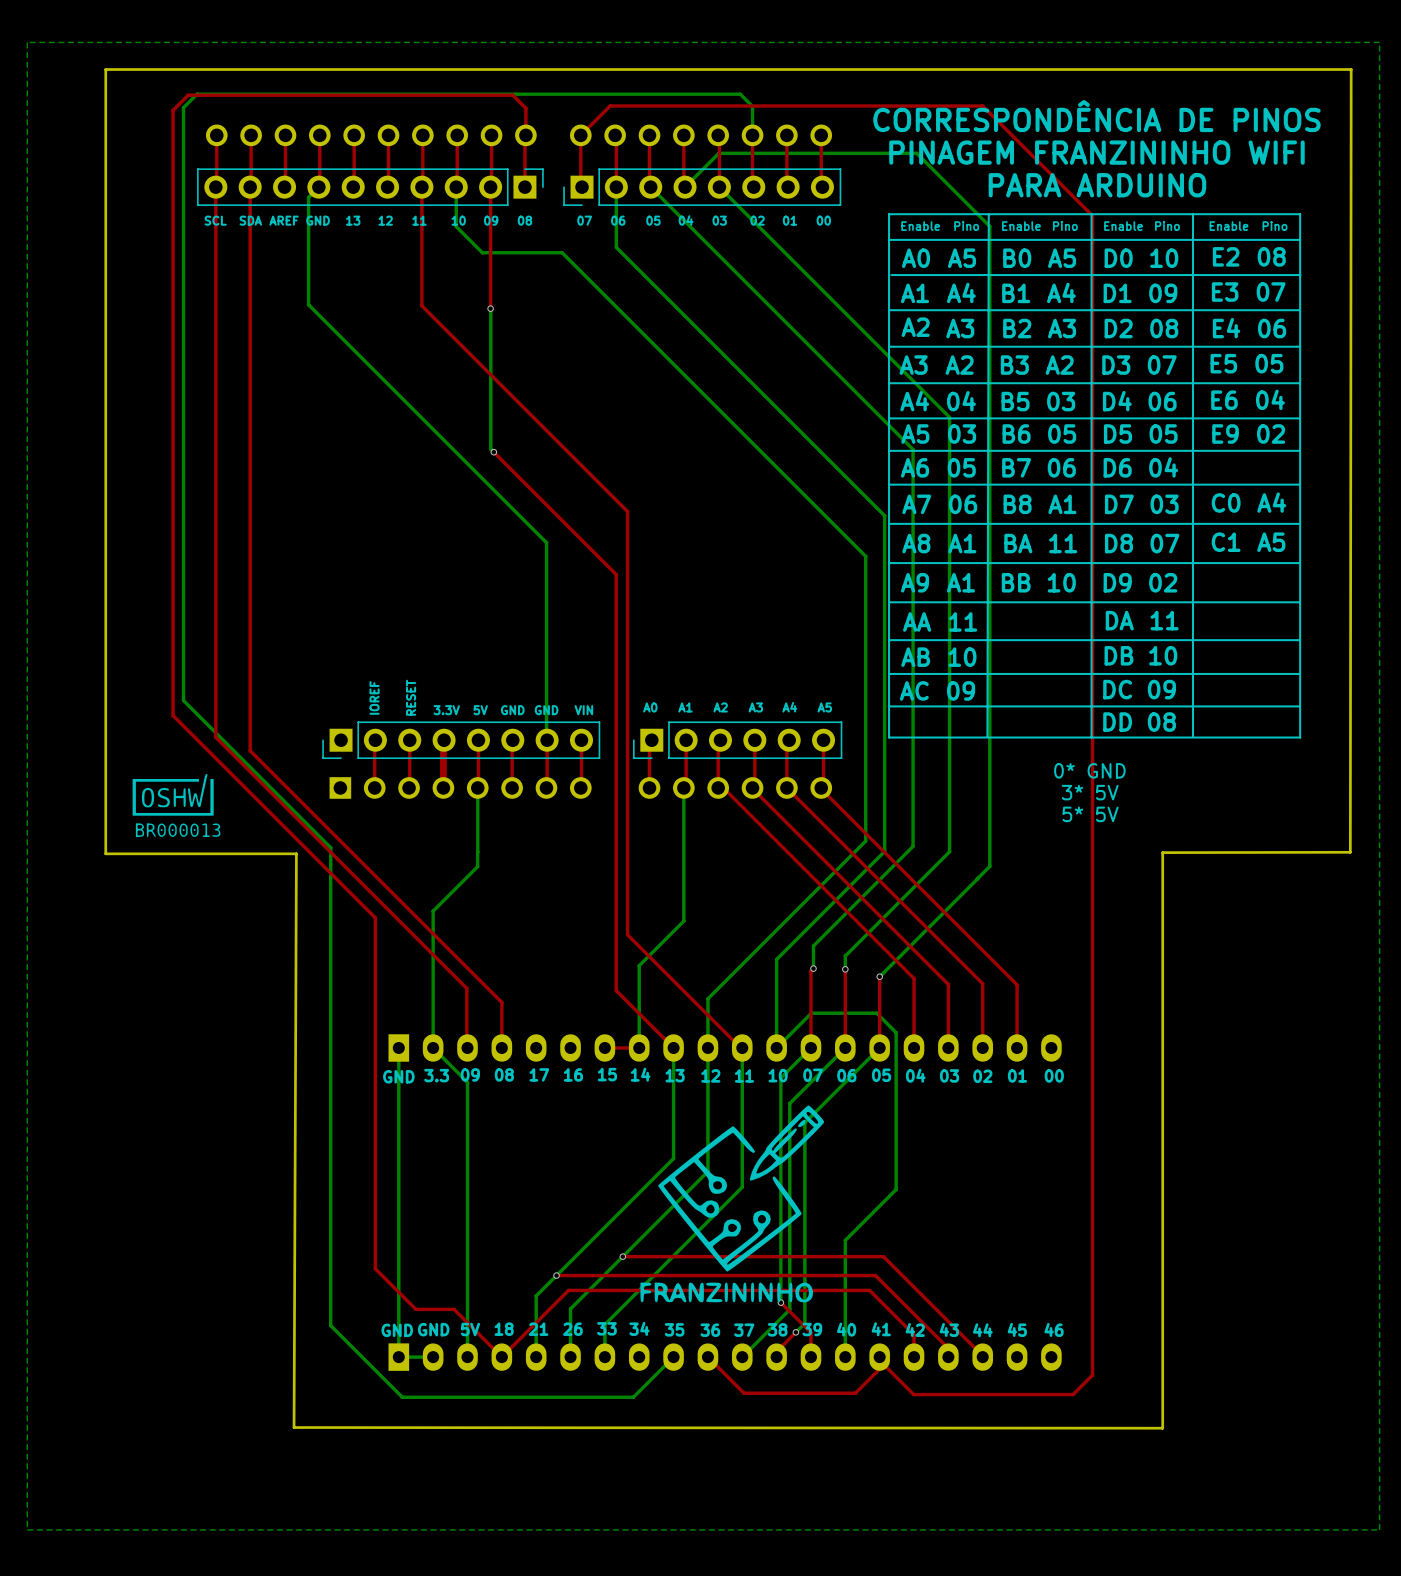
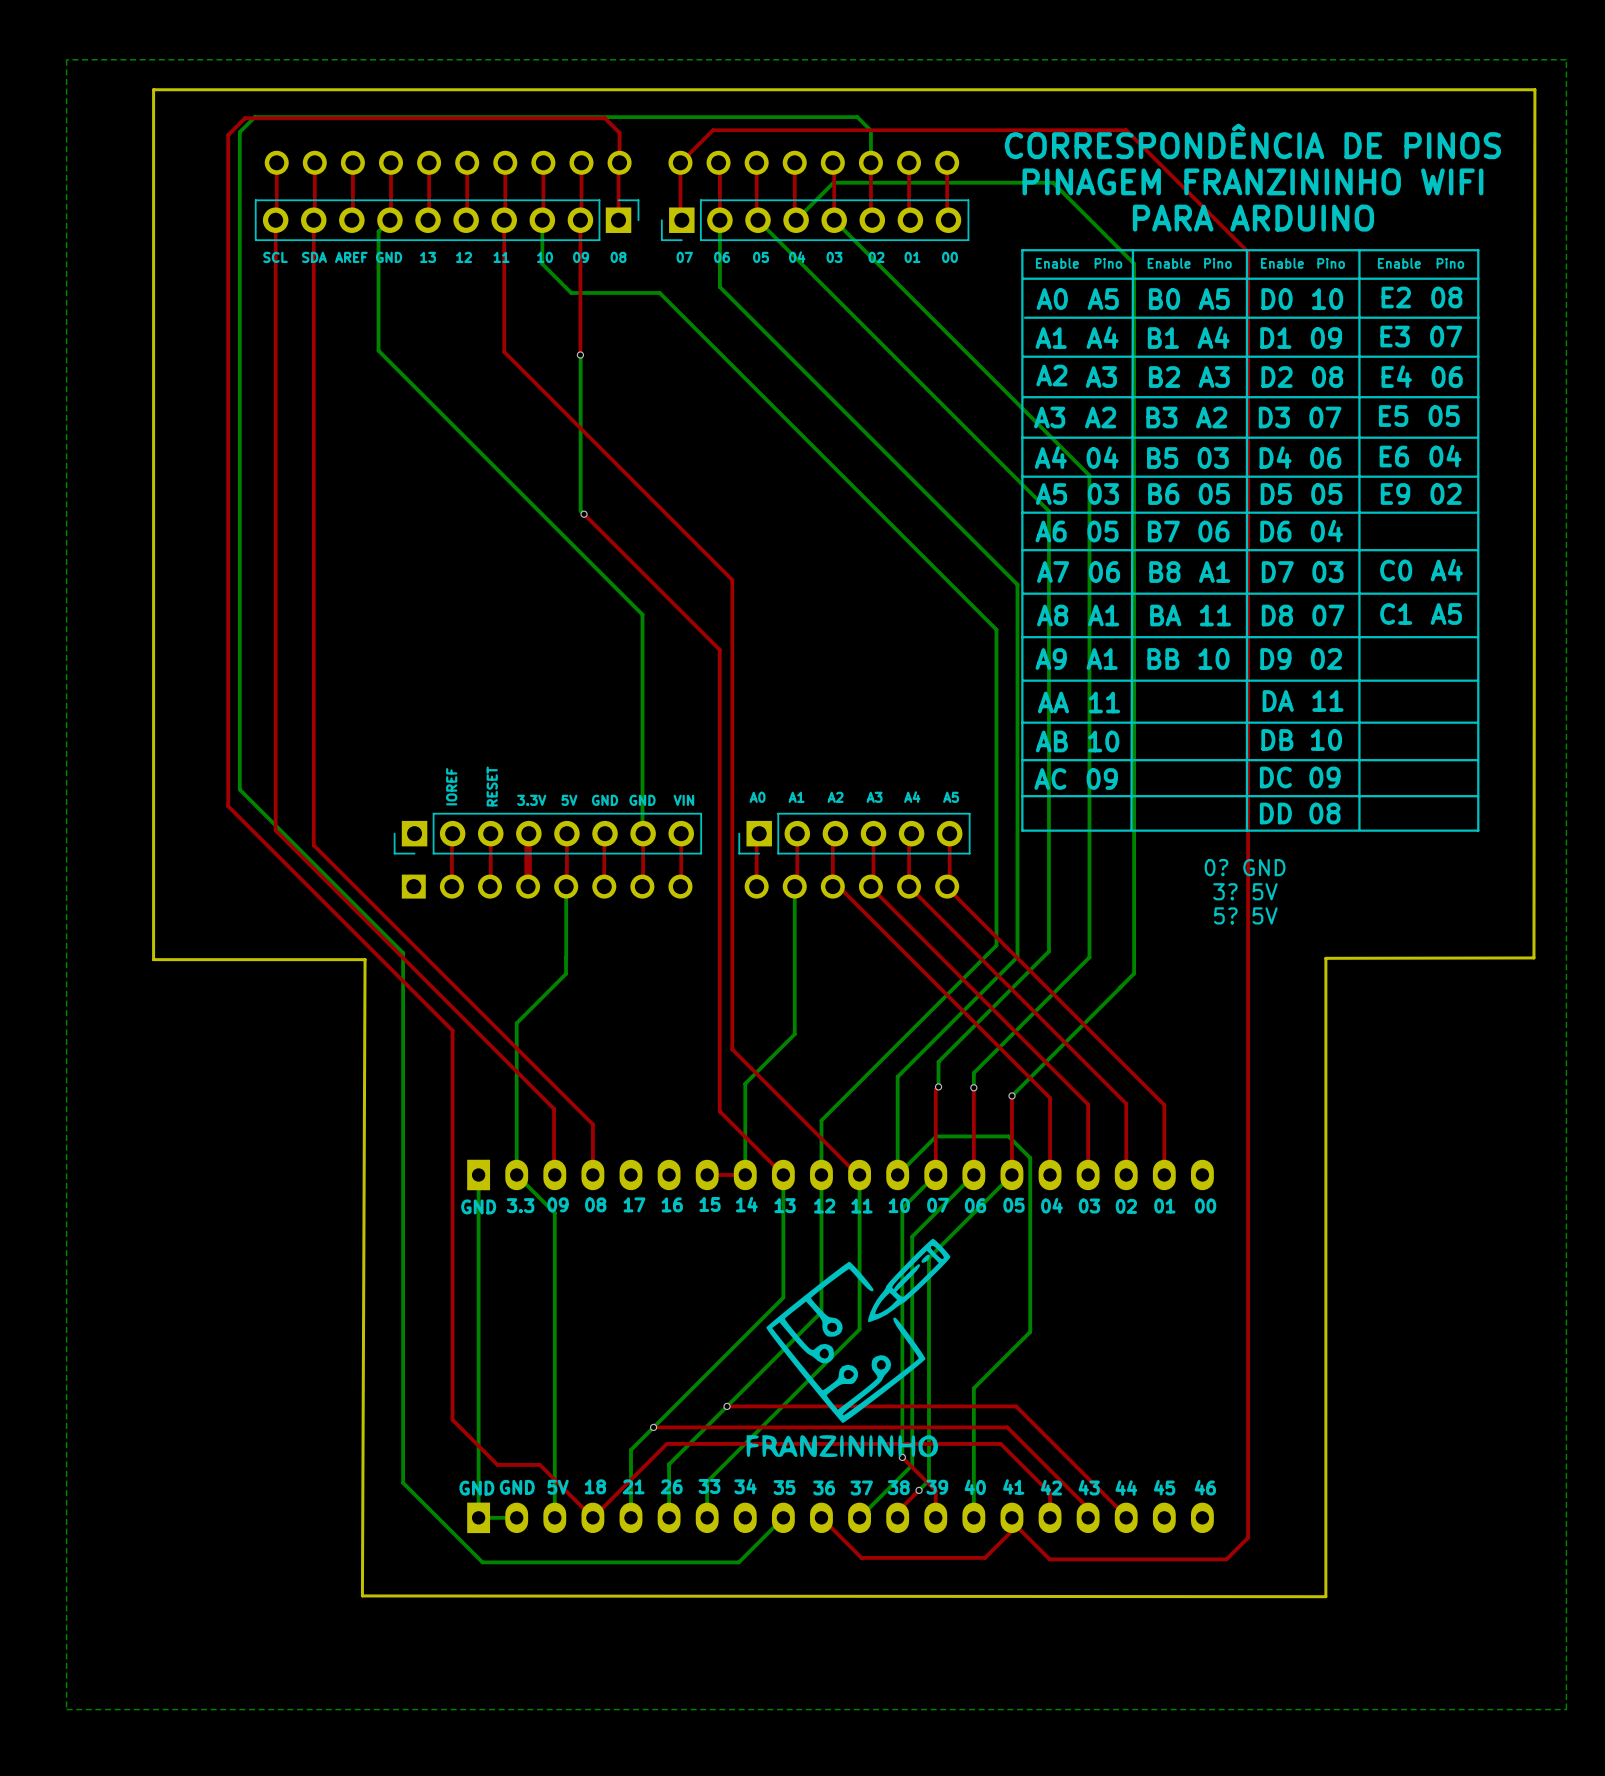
text: 0* GND (1089, 770) -> 0? GND (1245, 867)
drawing: [132, 774, 221, 838] -> none
text: 3* 5V (1090, 792) -> 3? 5V (1245, 891)
text: 5* 5V (1090, 814) -> 5? 5V (1245, 915)

